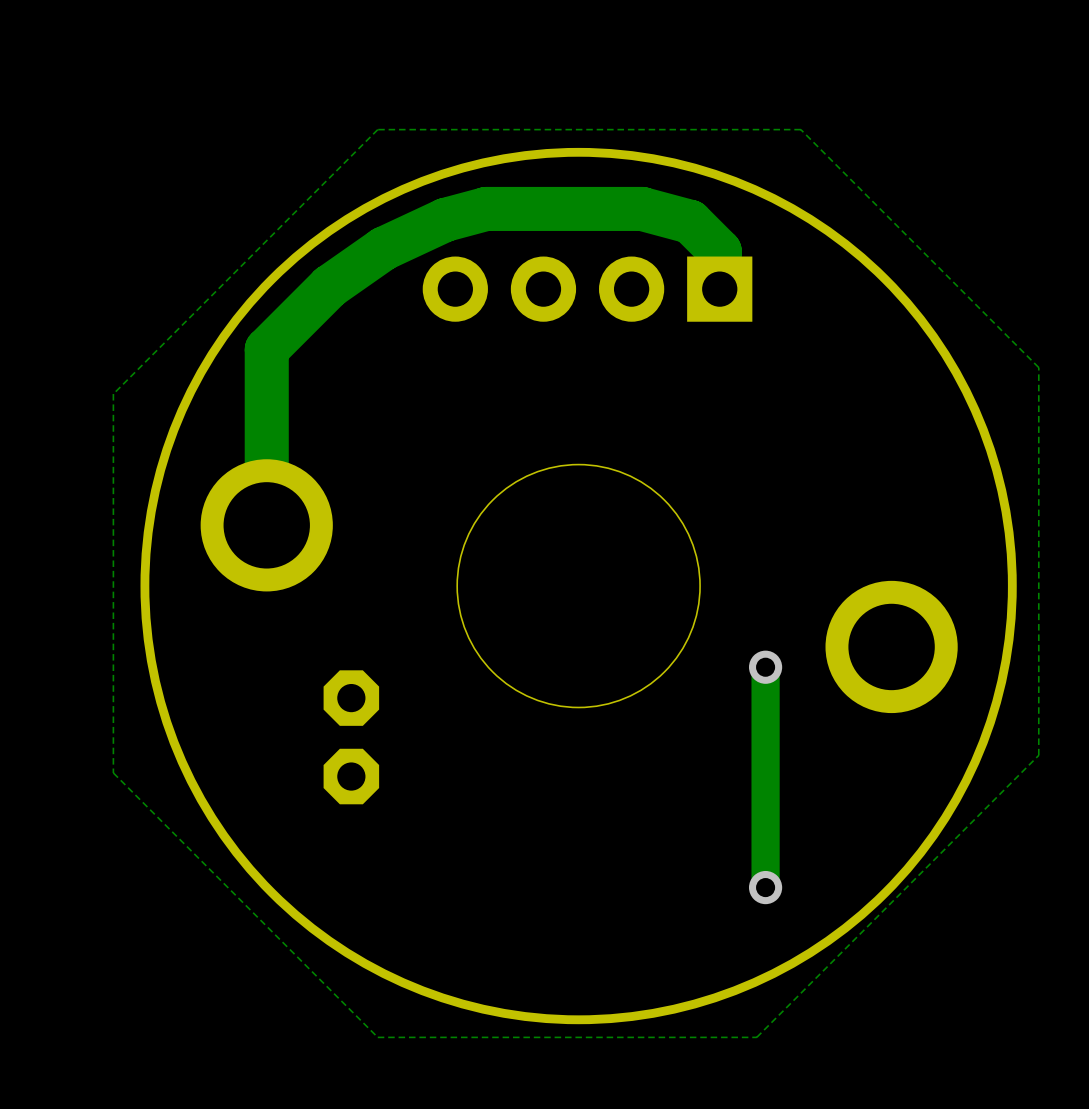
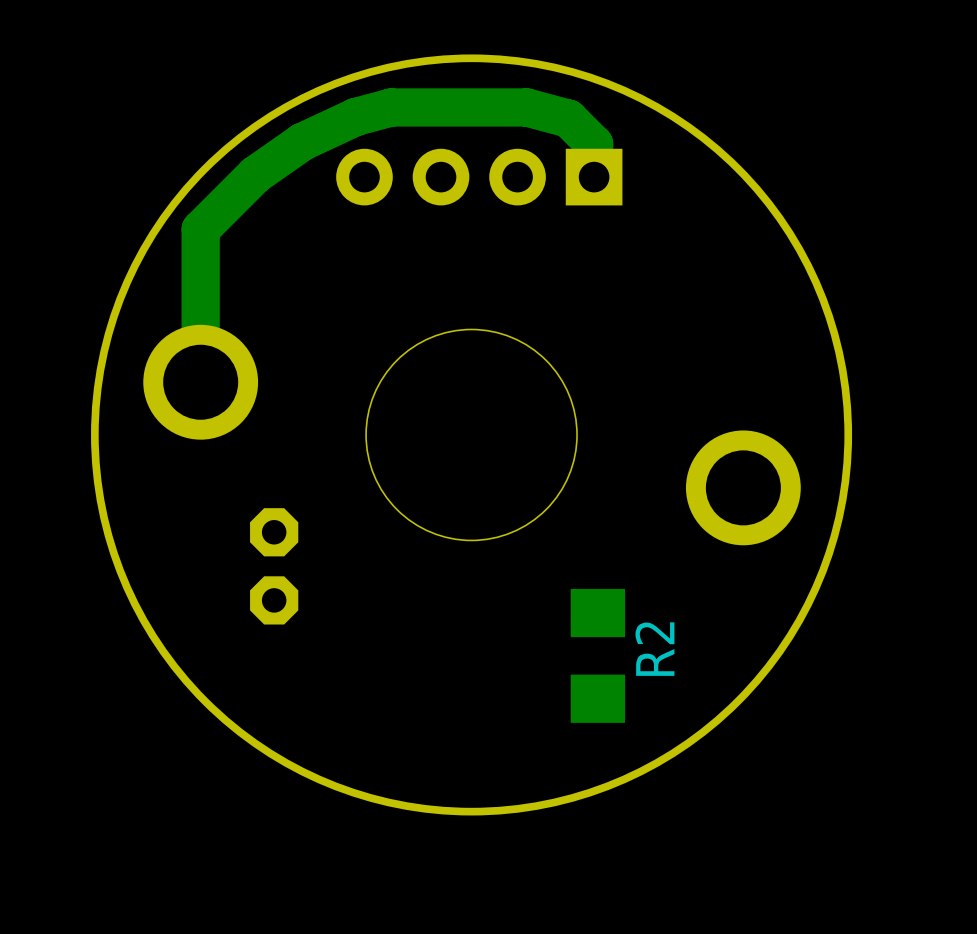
zone outline: (800, 129) (1038, 367) (1038, 755) (756, 1037) (377, 1037) (113, 773) (113, 394) (377, 129) (800, 129) -> none
track: (765, 667) (765, 887) -> none
via: (765, 667) -> none
R2: none -> (597, 655)
via: (765, 887) -> none

